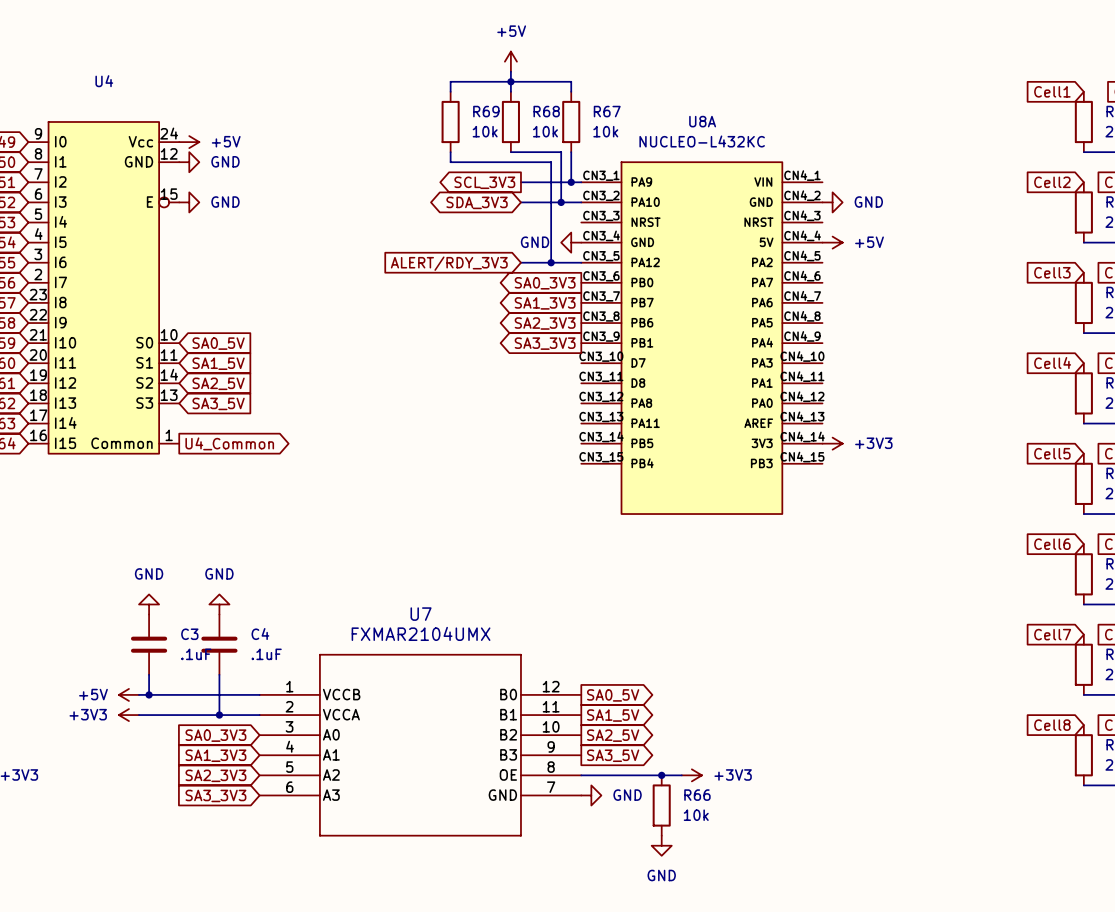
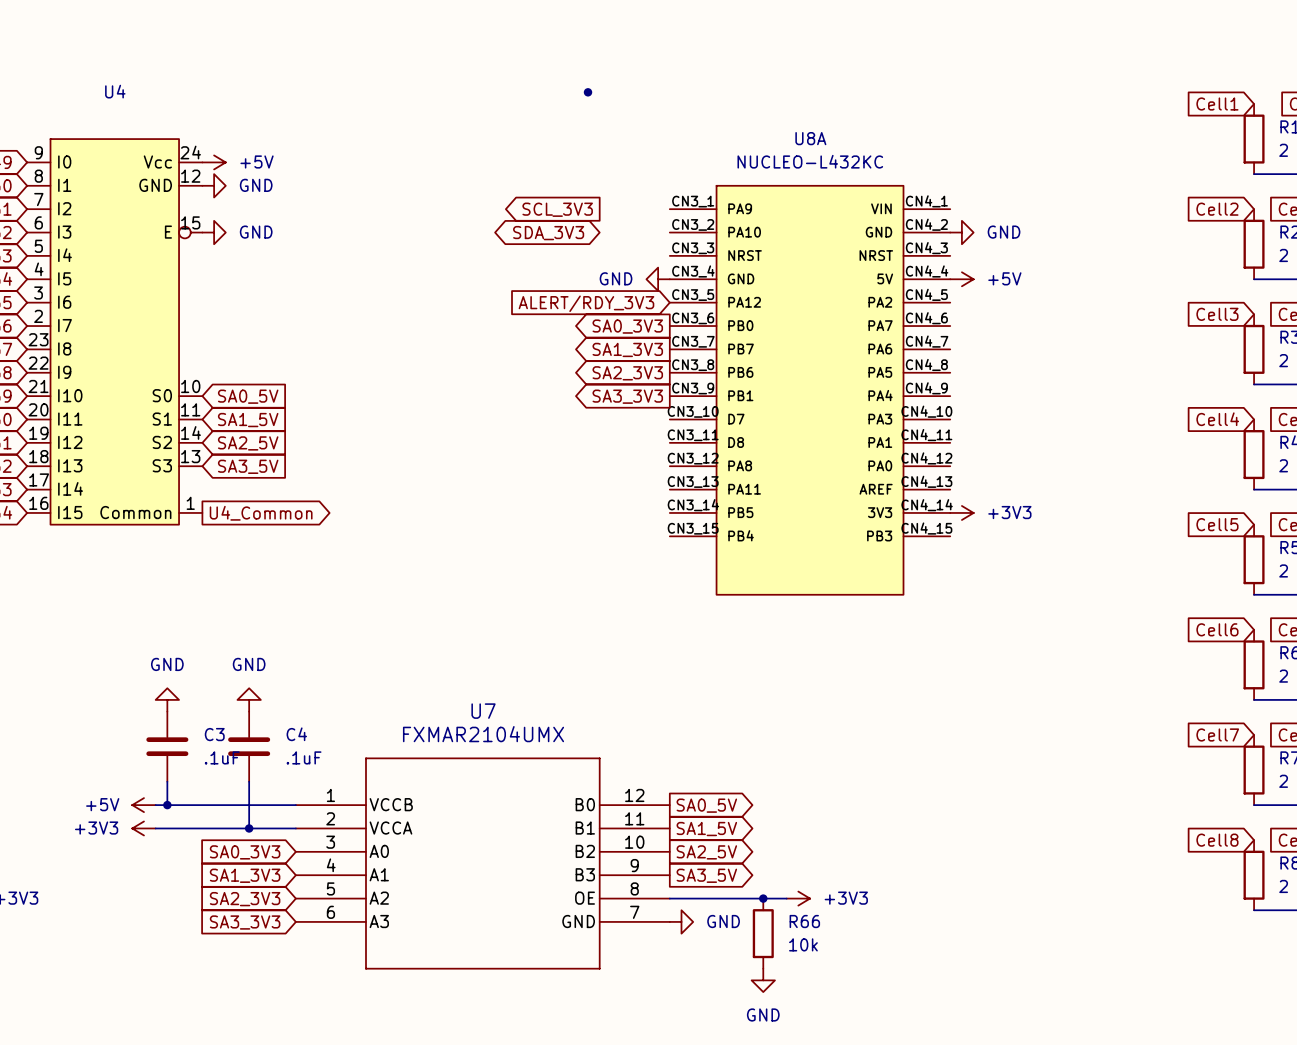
power symbol: +5V (510, 61) -> none
wire: (510, 71) (510, 91) -> none
wire: (450, 91) (450, 81) (571, 81) (571, 91) -> none
R69: 10k (450, 121) -> none
R68: 10k (510, 121) -> none
R67: 10k (571, 121) -> none
wire: (450, 152) (450, 162) (551, 162) (551, 262) -> none
wire: (510, 152) (561, 152) (561, 202) -> none
wire: (571, 152) (571, 182) -> none
wire: (520, 182) (581, 182) -> none
junction: (571, 182) -> none
wire: (520, 202) (581, 202) -> none
junction: (561, 202) -> none
wire: (520, 262) (581, 262) -> none
junction: (551, 262) -> none
global label position: ALERT/RDY_3V3 (449, 263) -> ALERT/RDY_3V3 (586, 303)

